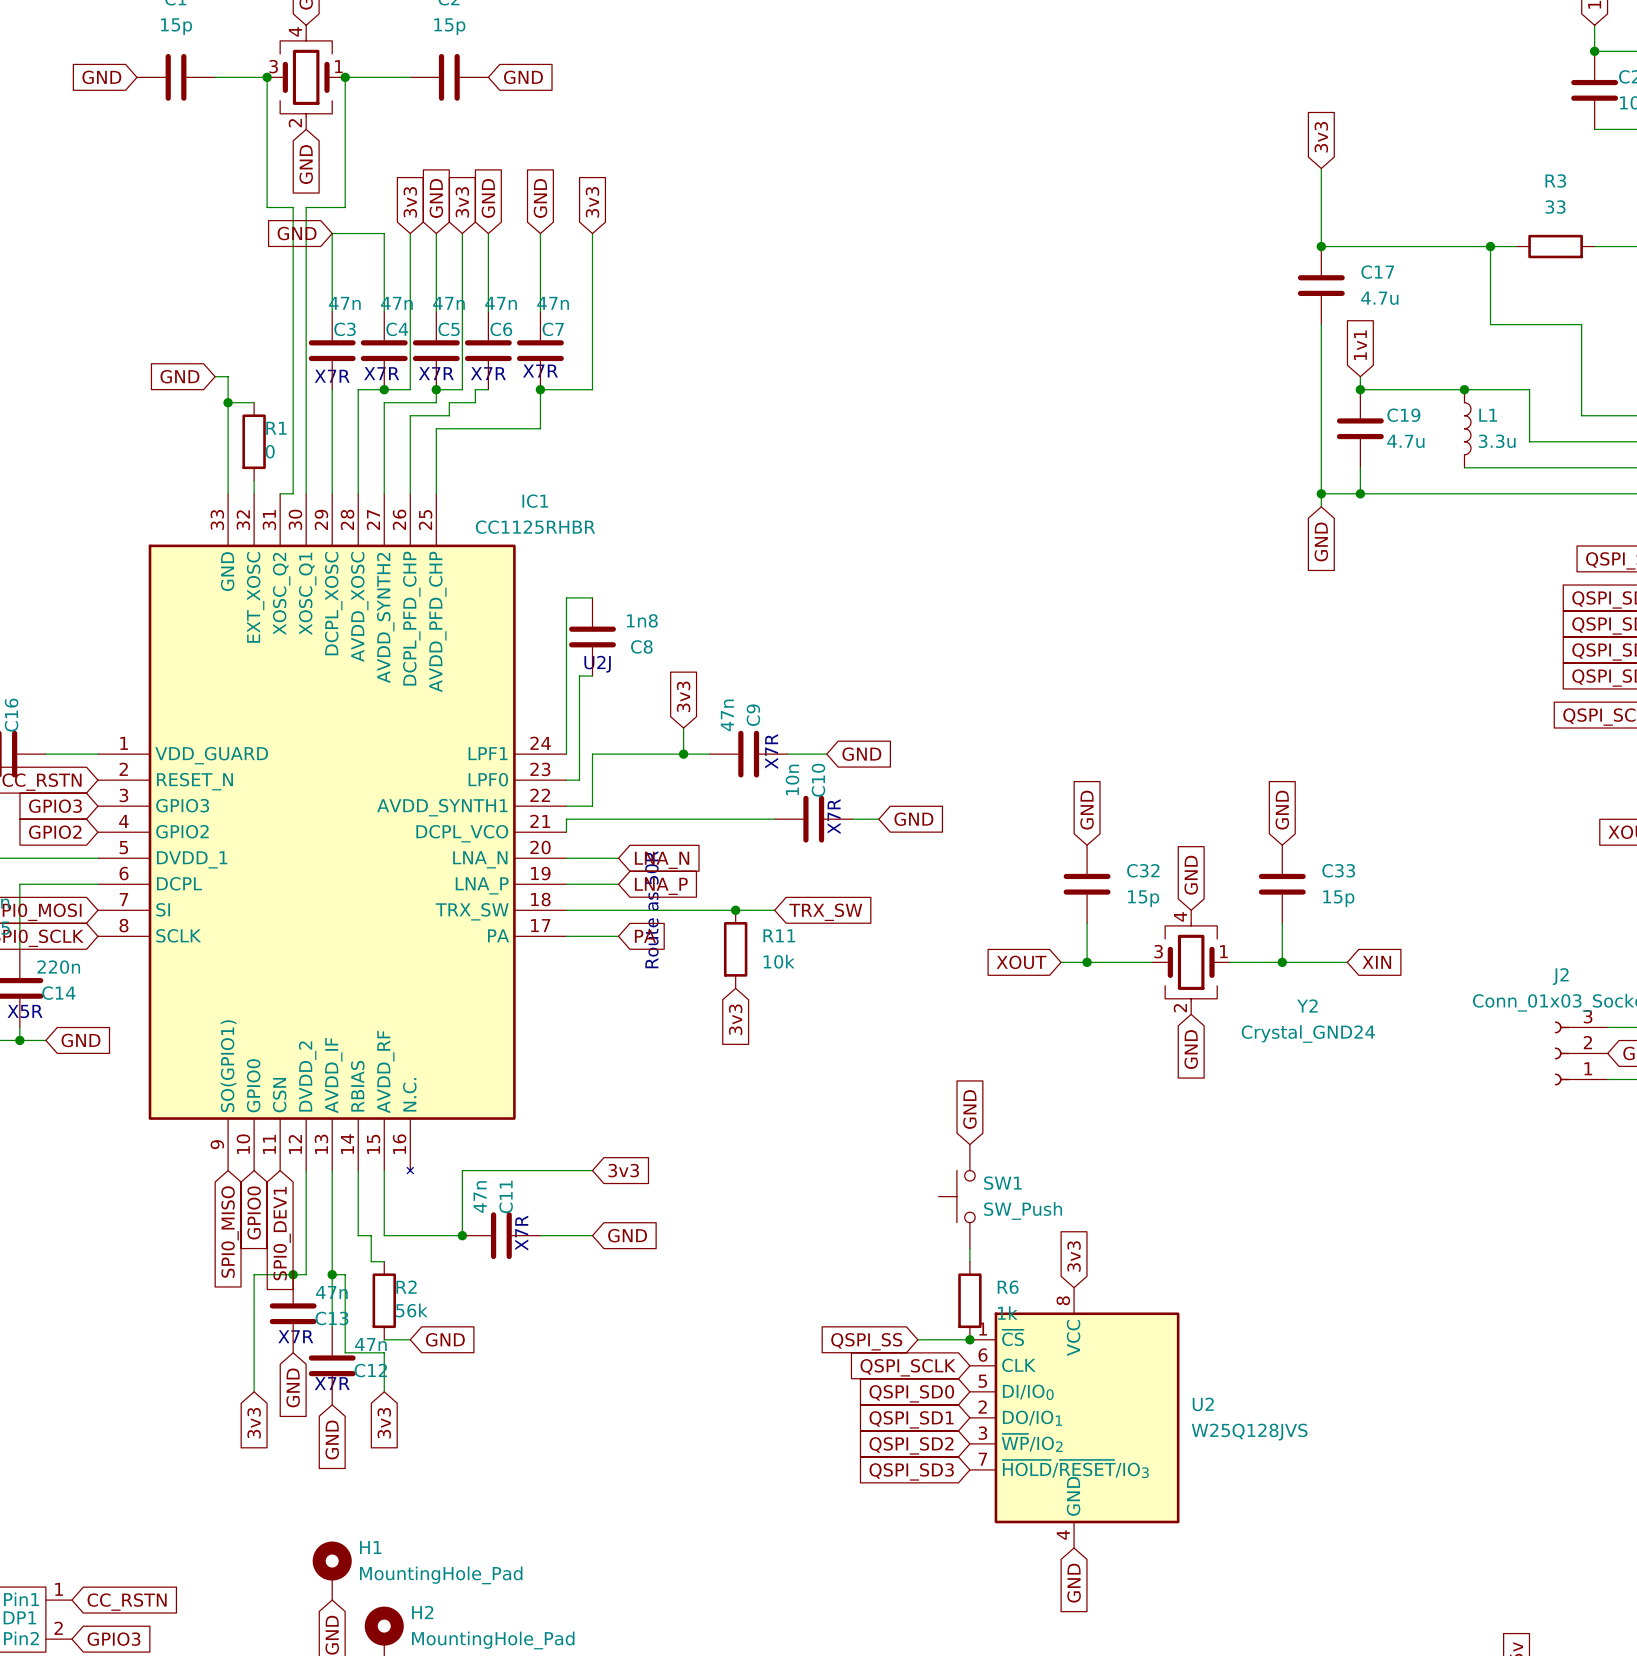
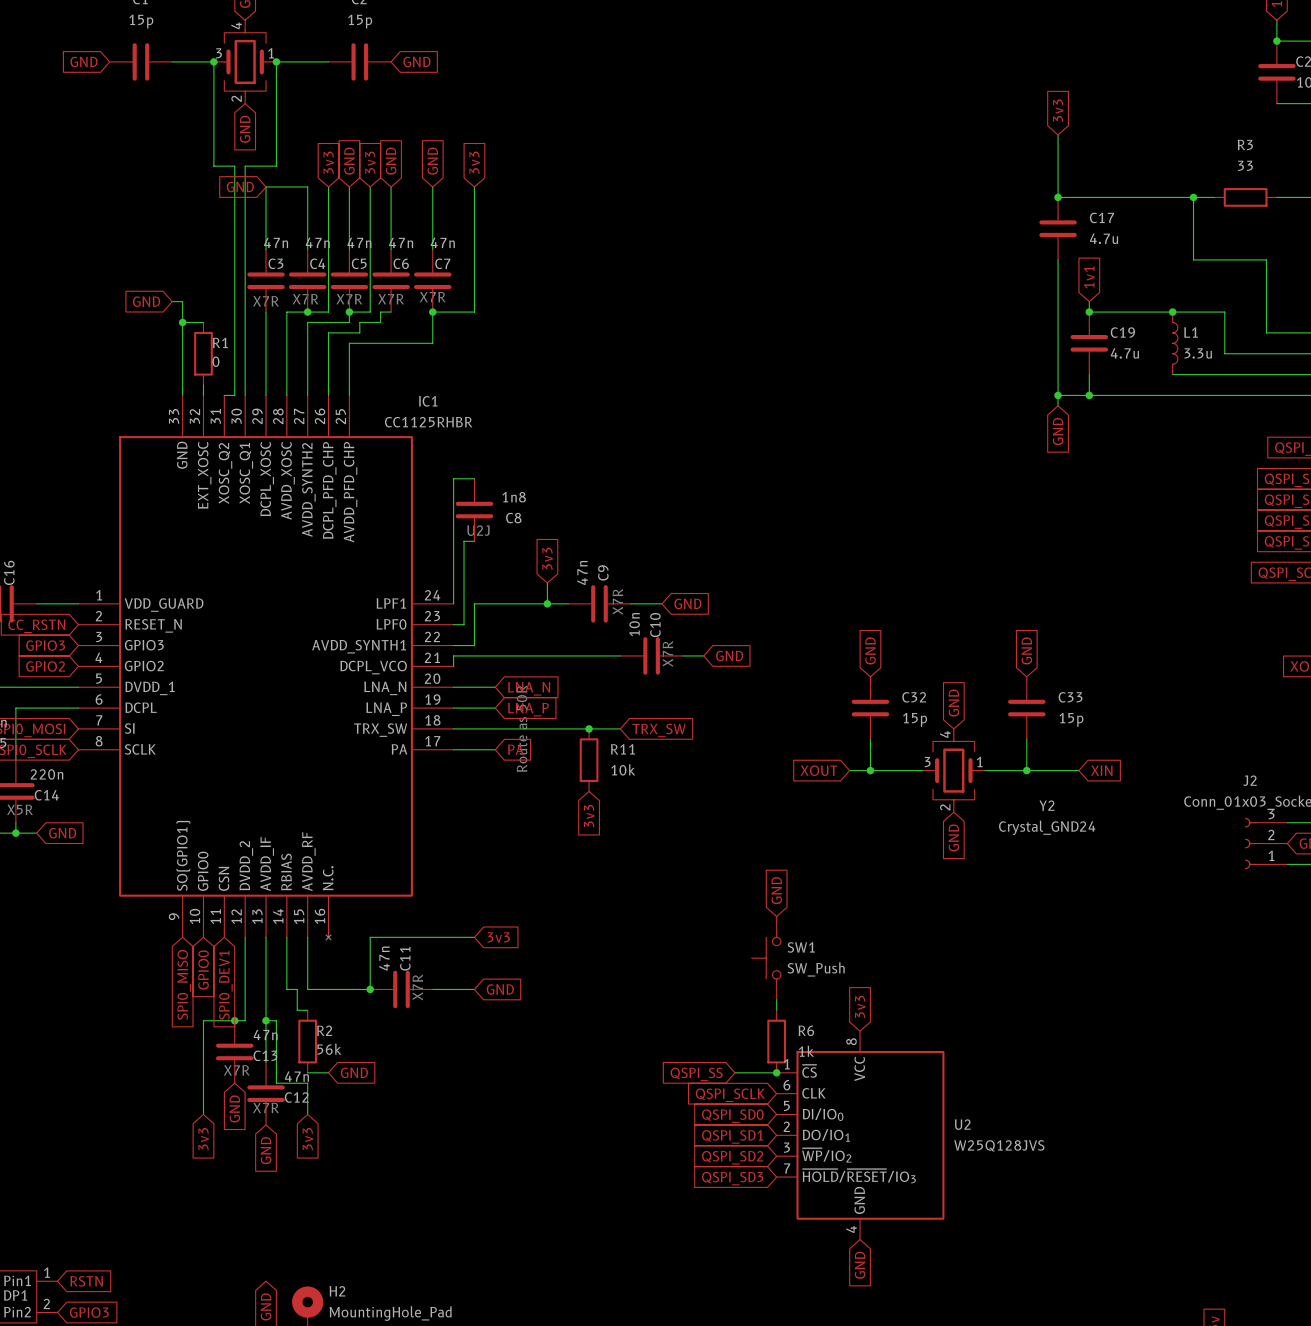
H1: MountingHole_Pad (332, 1570) -> none
global label: CC_RSTN (127, 1602) -> RSTN (86, 1281)

